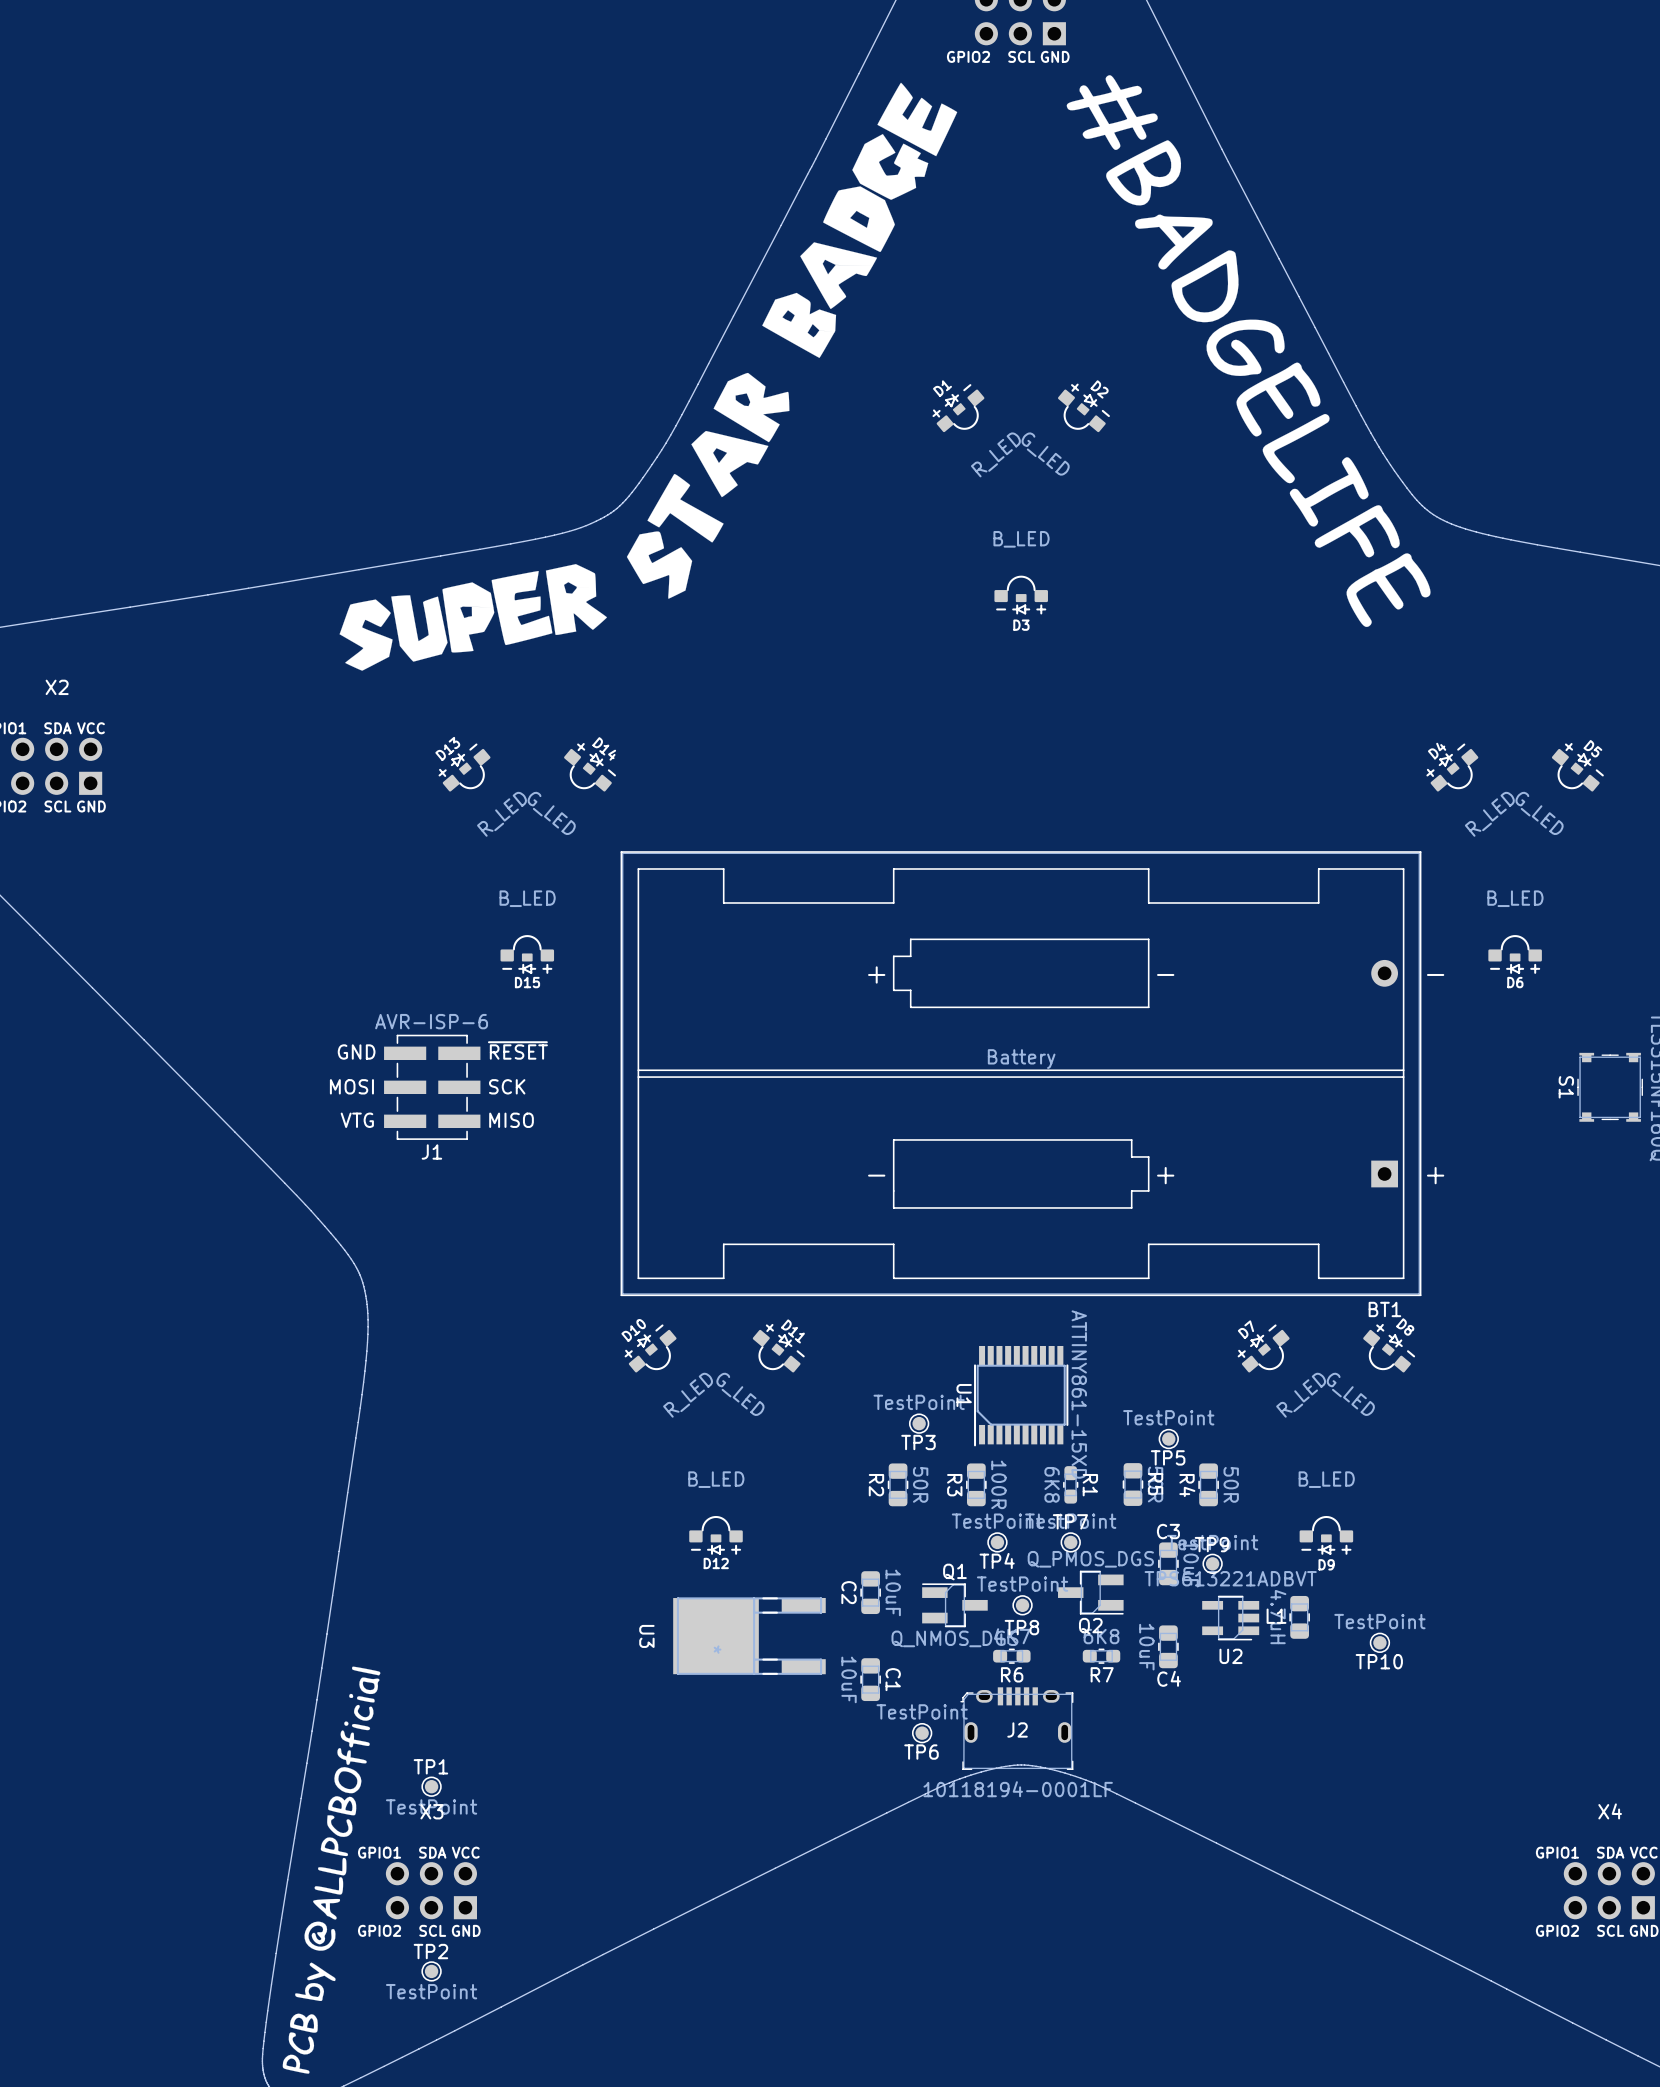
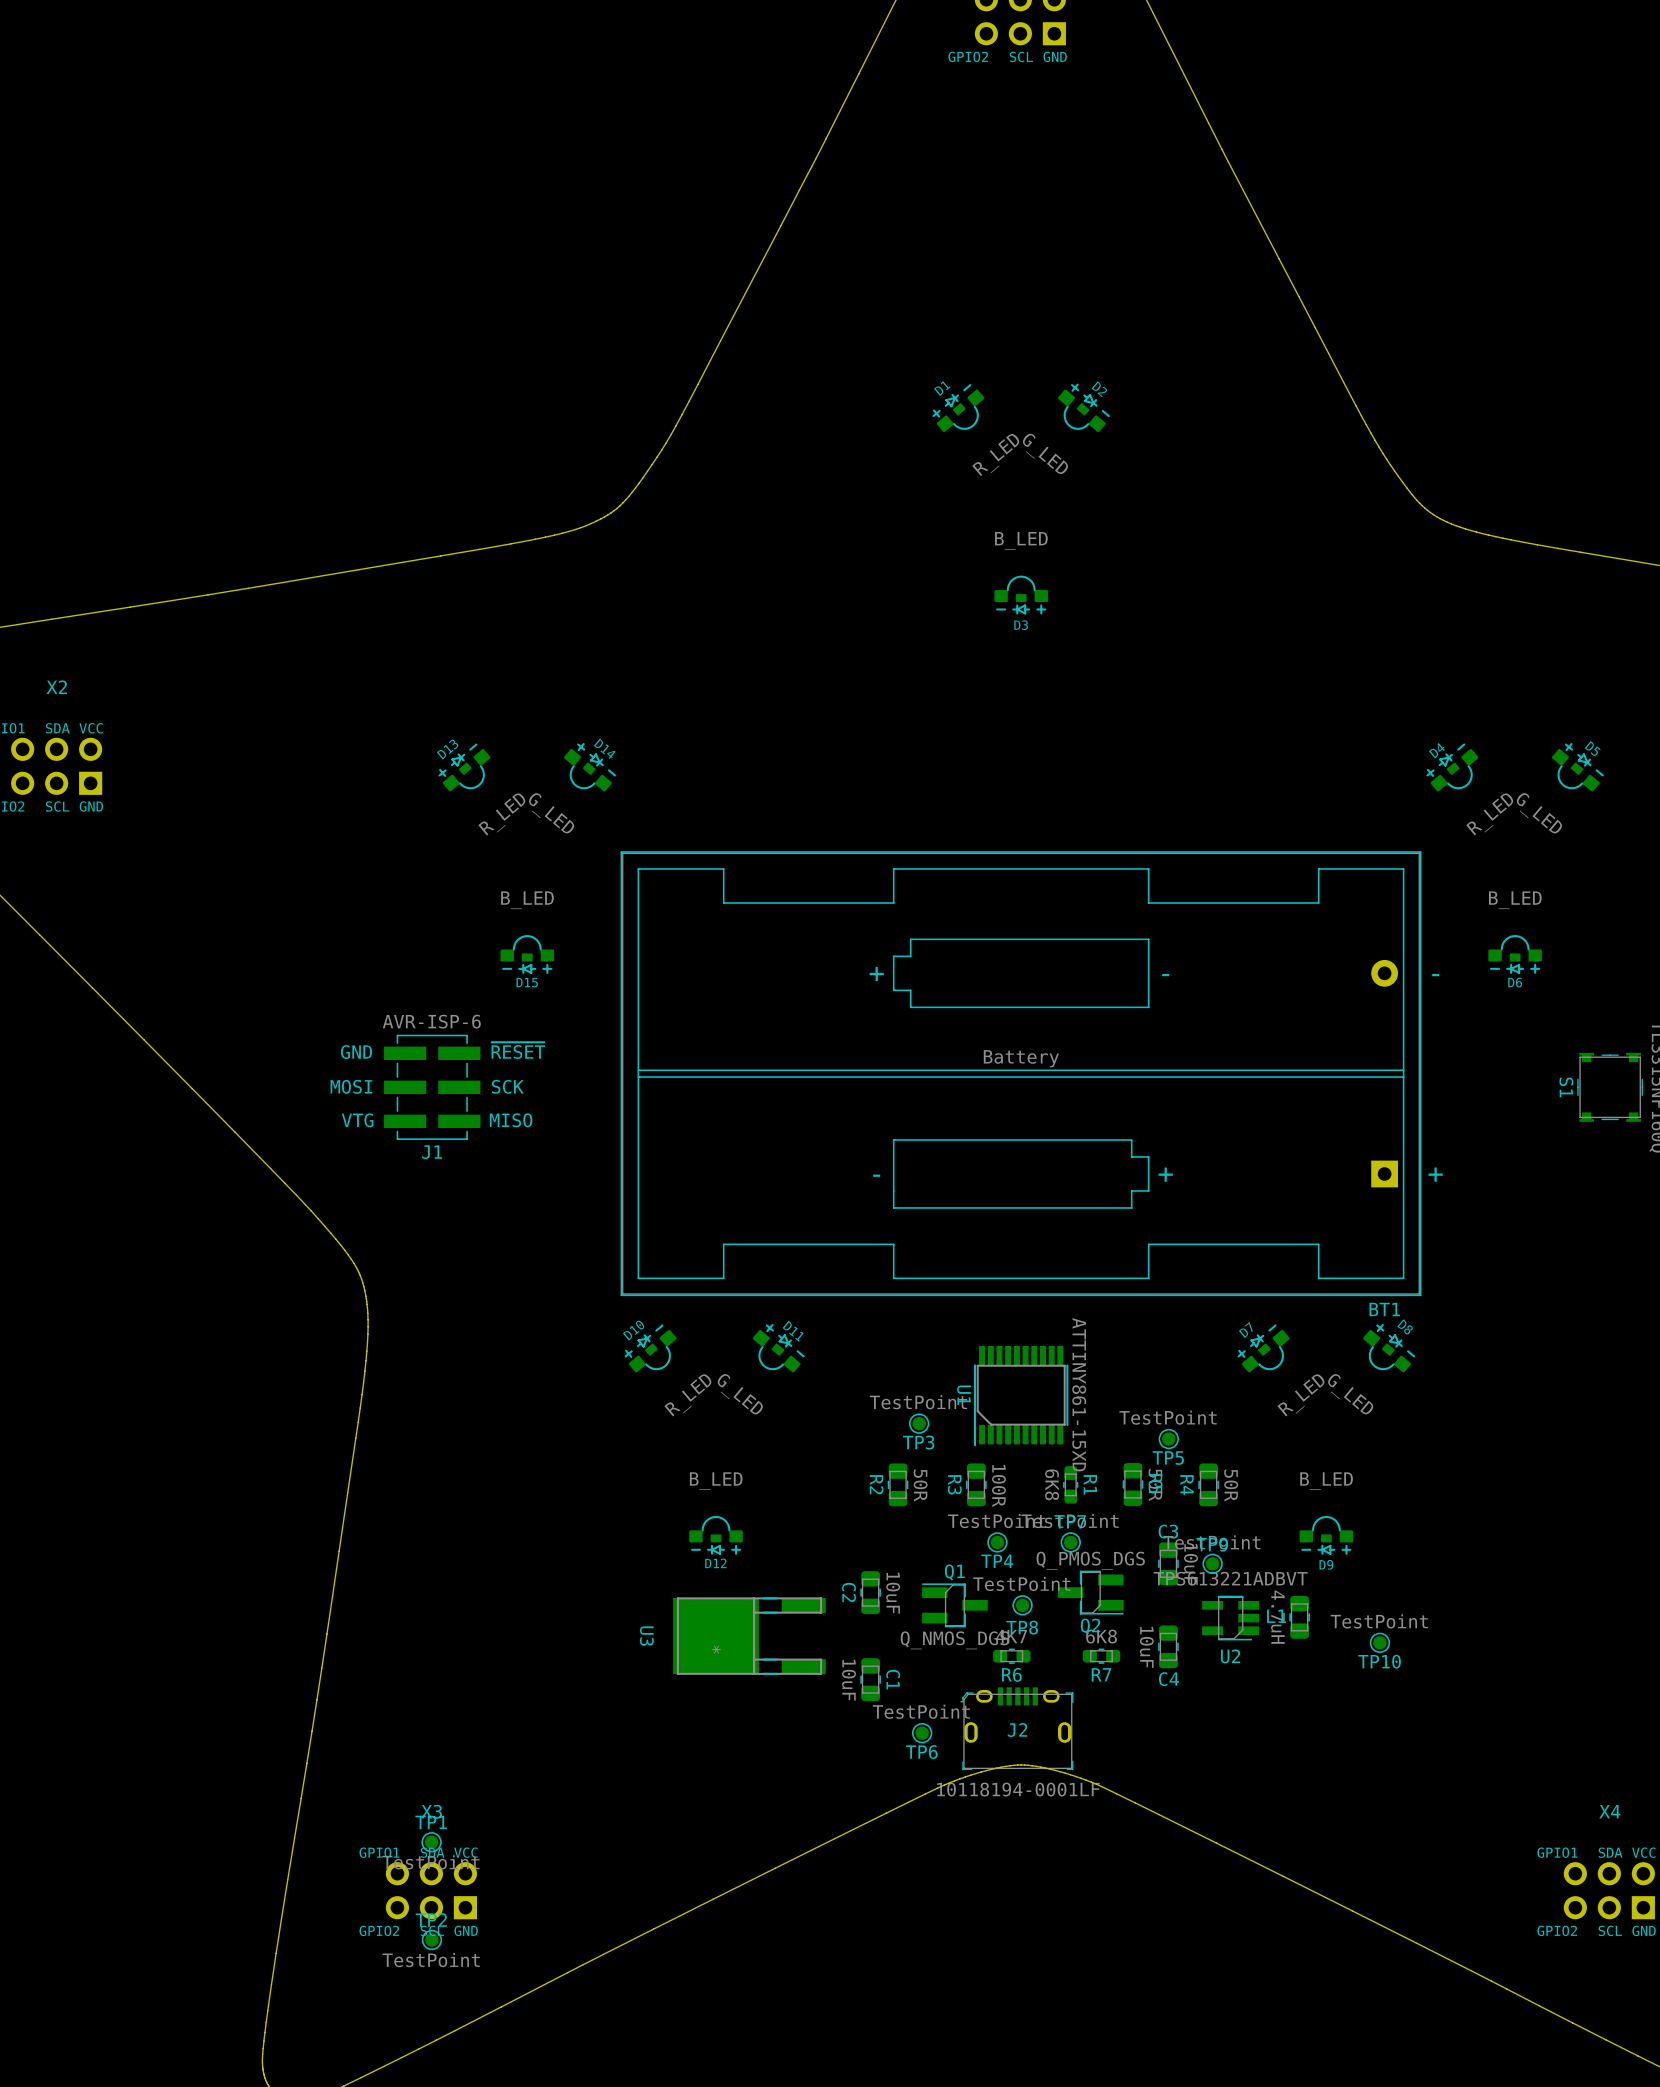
drawing: [282, 75, 1431, 2074] -> none
TP1 position: (431, 1786) -> (431, 1842)
TP2 position: (431, 1971) -> (431, 1939)

